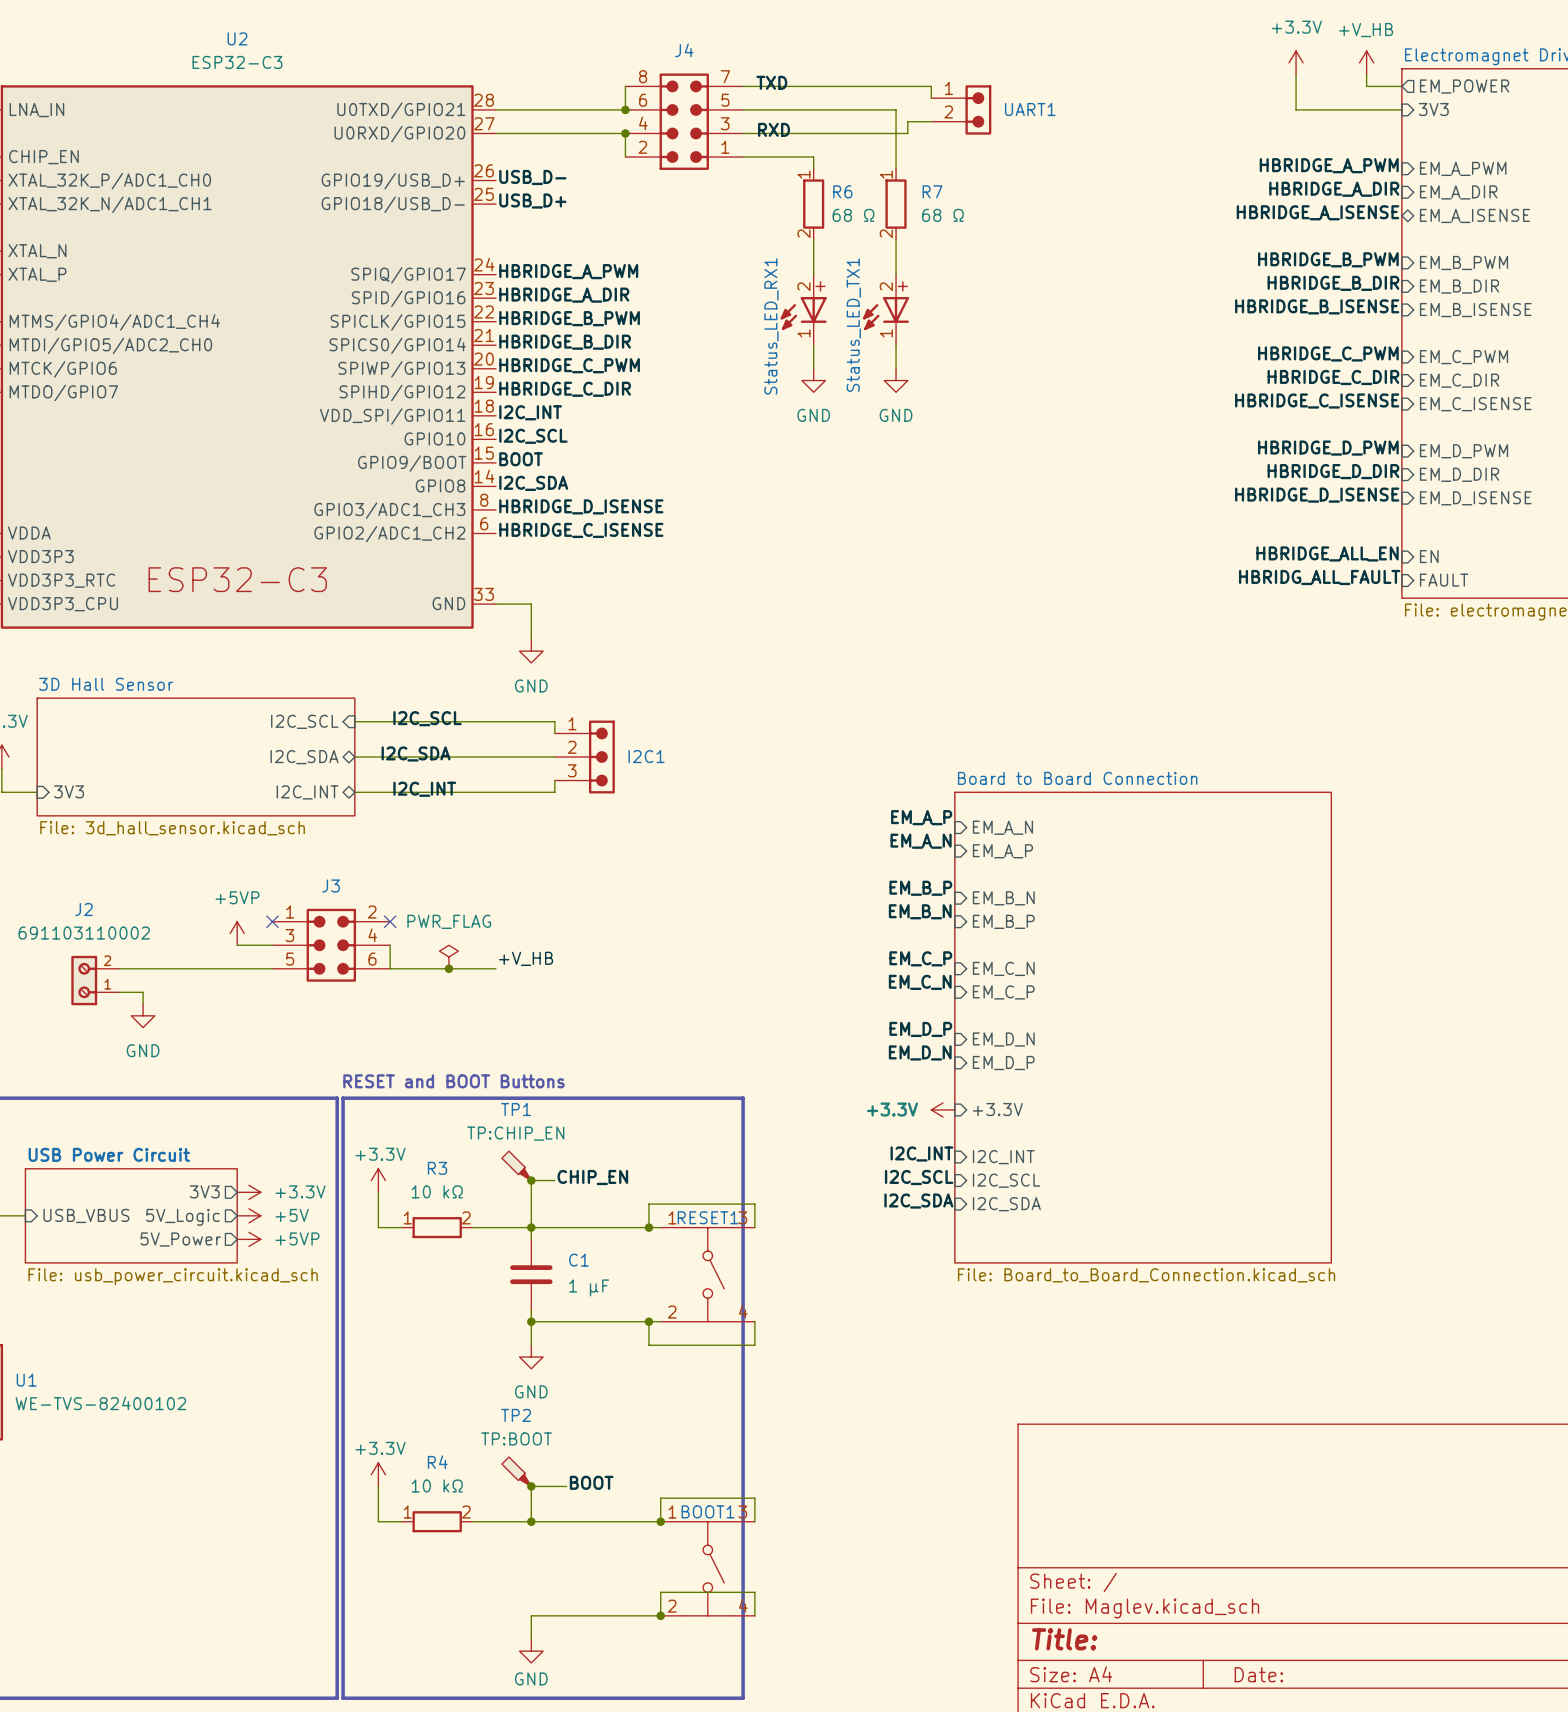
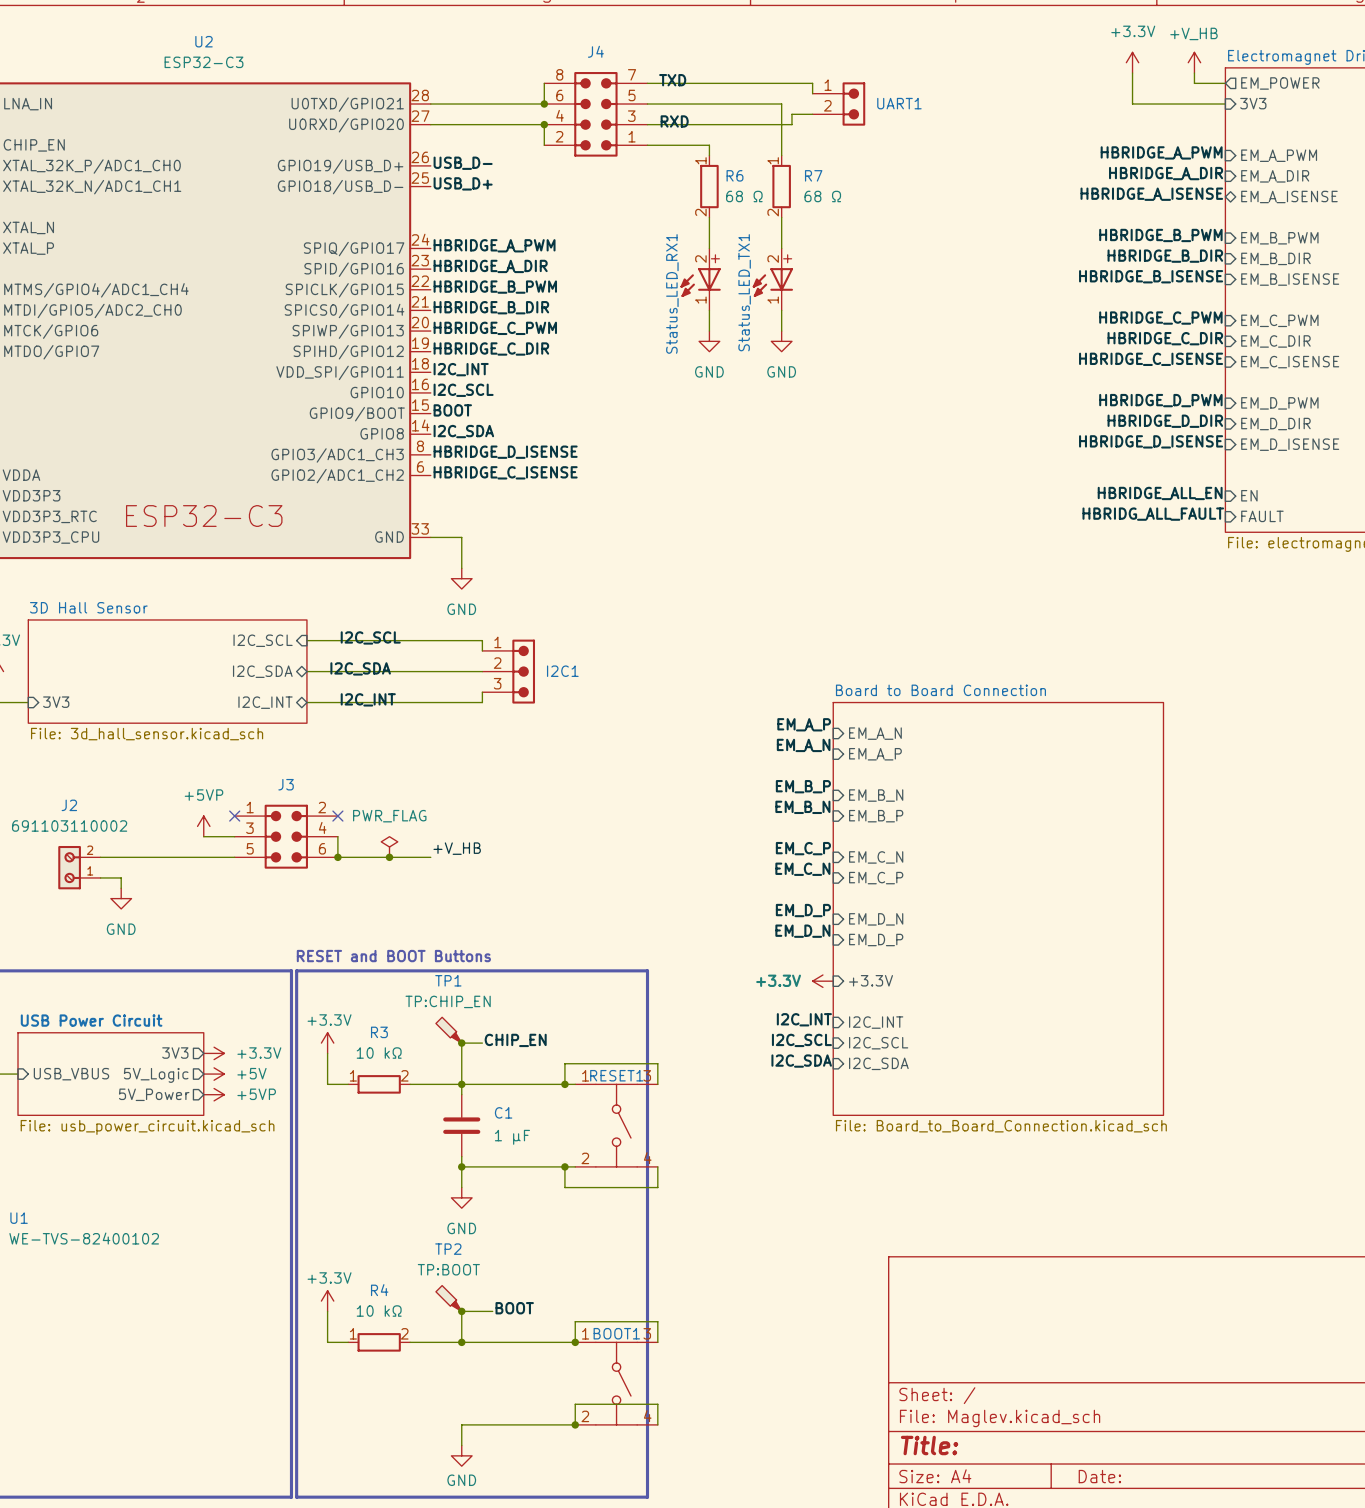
junction: none -> (337, 857)

